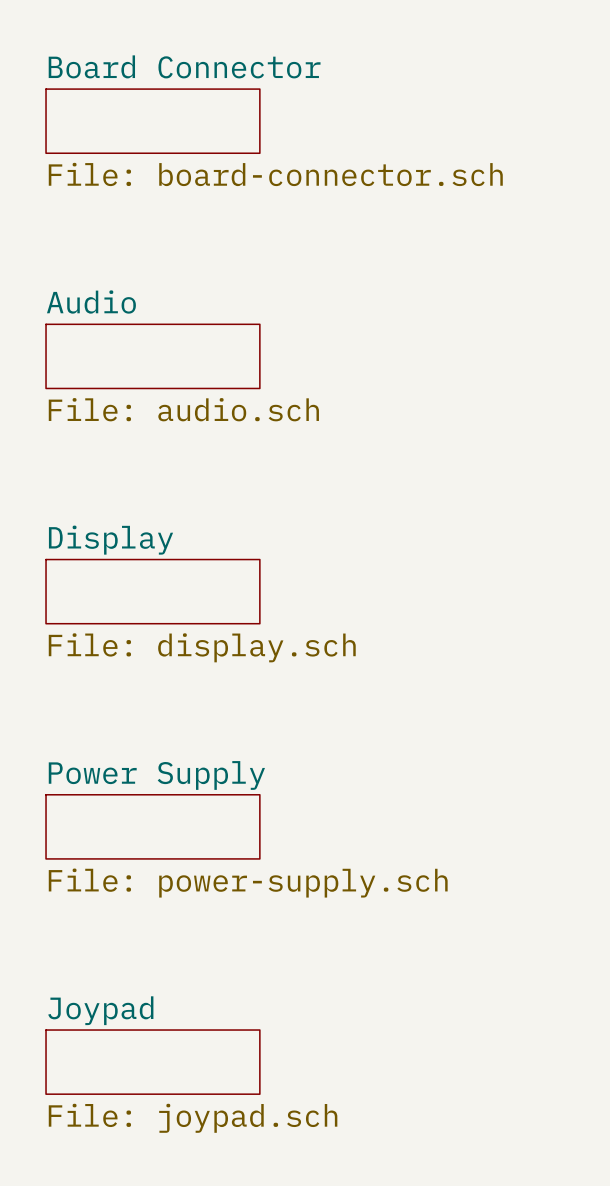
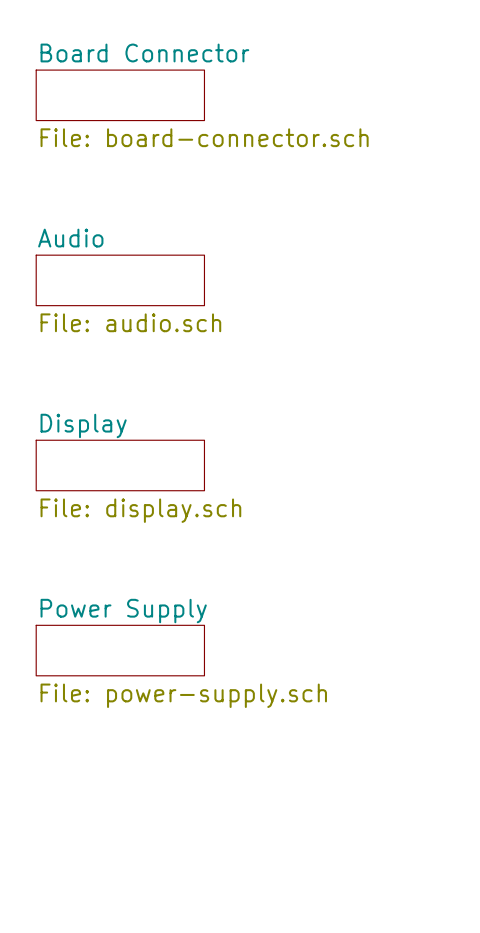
sheet Joypad: File: joypad.sch (152, 1062) -> none

